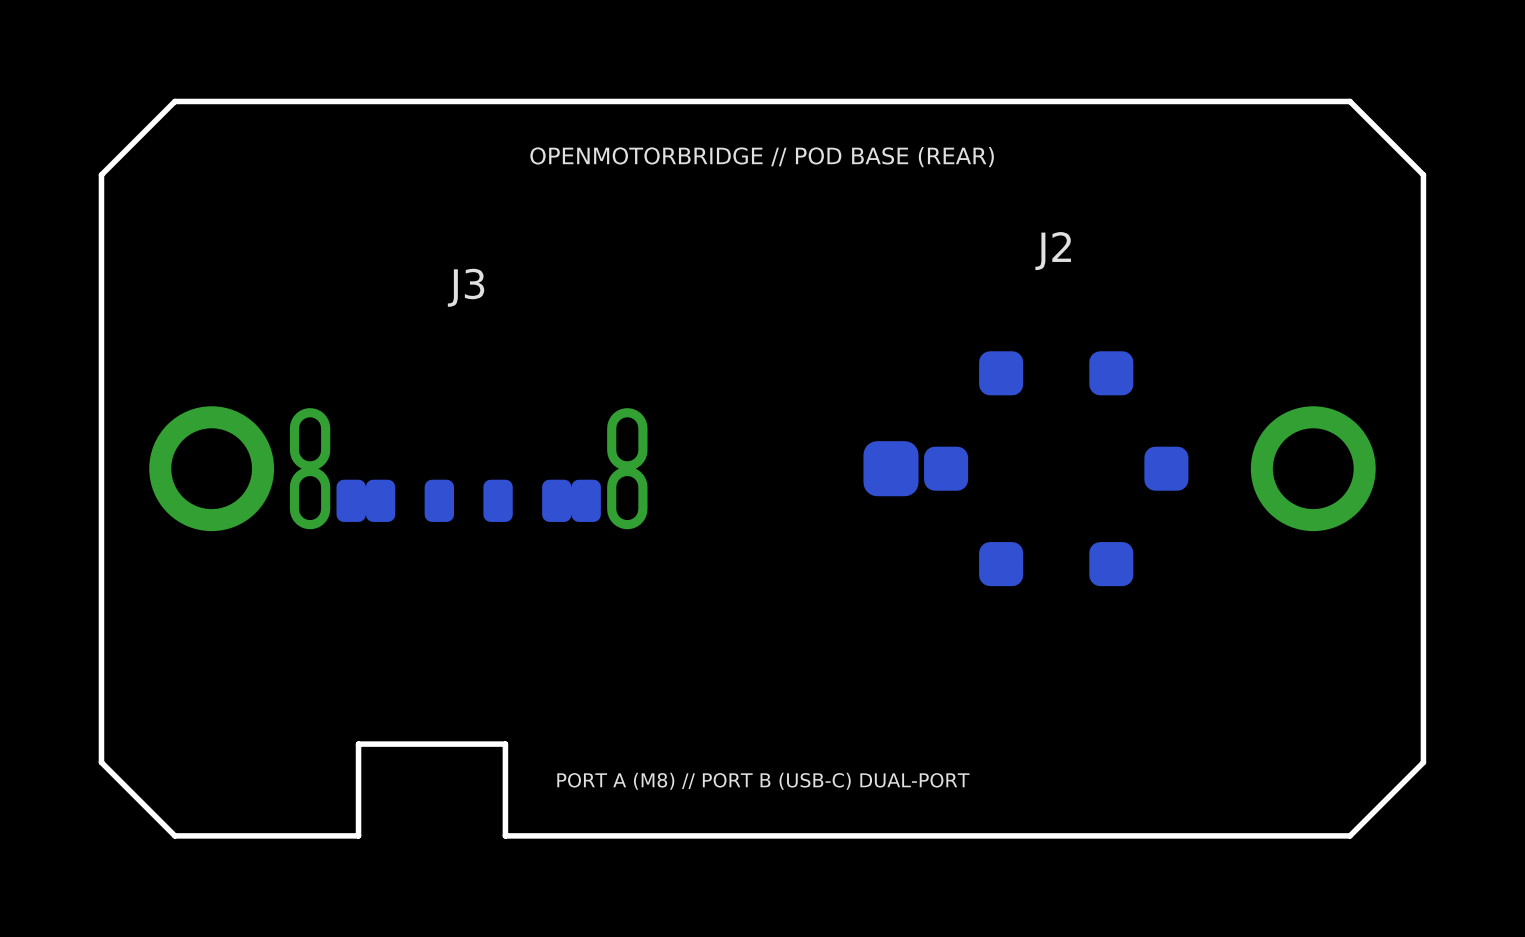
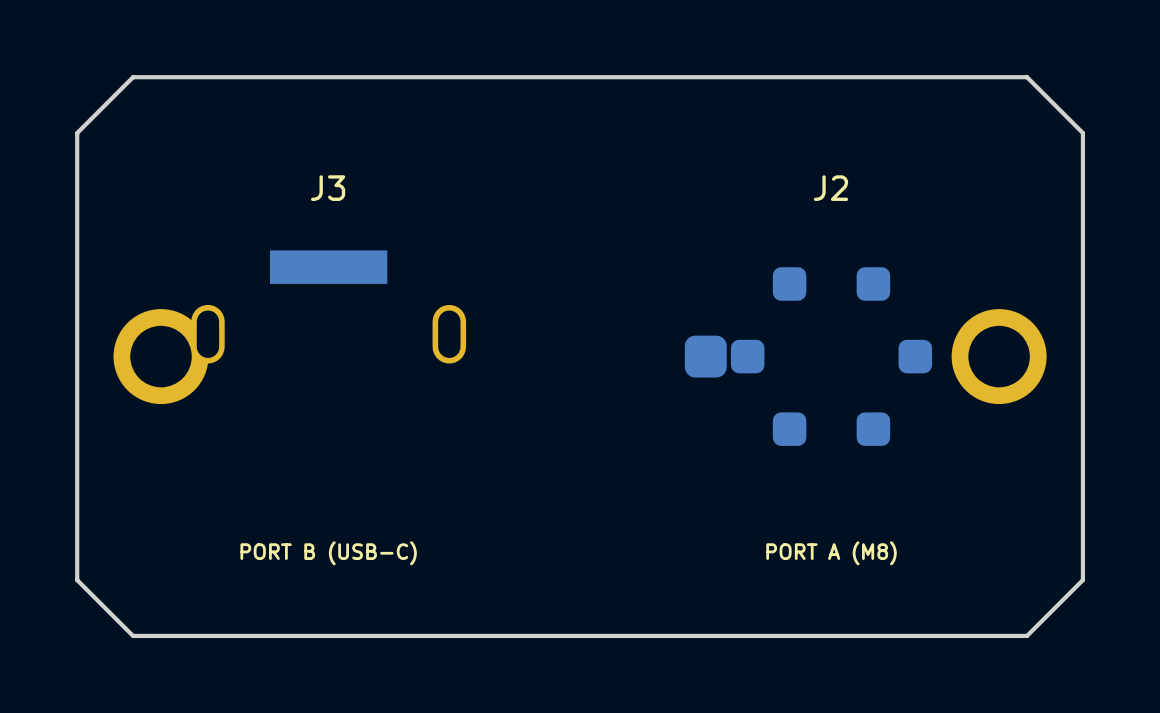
text: OPENMOTORBRIDGE // POD BASE (REAR) (762, 157) -> none
J3 footprint: [289, 408, 648, 530] -> [191, 250, 467, 364]
J2 position: (1025, 468) -> (808, 356)
text: none -> PORT B (USB-C) (328, 553)
text: none -> PORT A (M8) (831, 553)
text: PORT A (M8) // PORT B (USB-C) DUAL-PORT (763, 781) -> none
board edge: (505, 835) (505, 744) (358, 744) (358, 835) -> (384, 635) (272, 635)

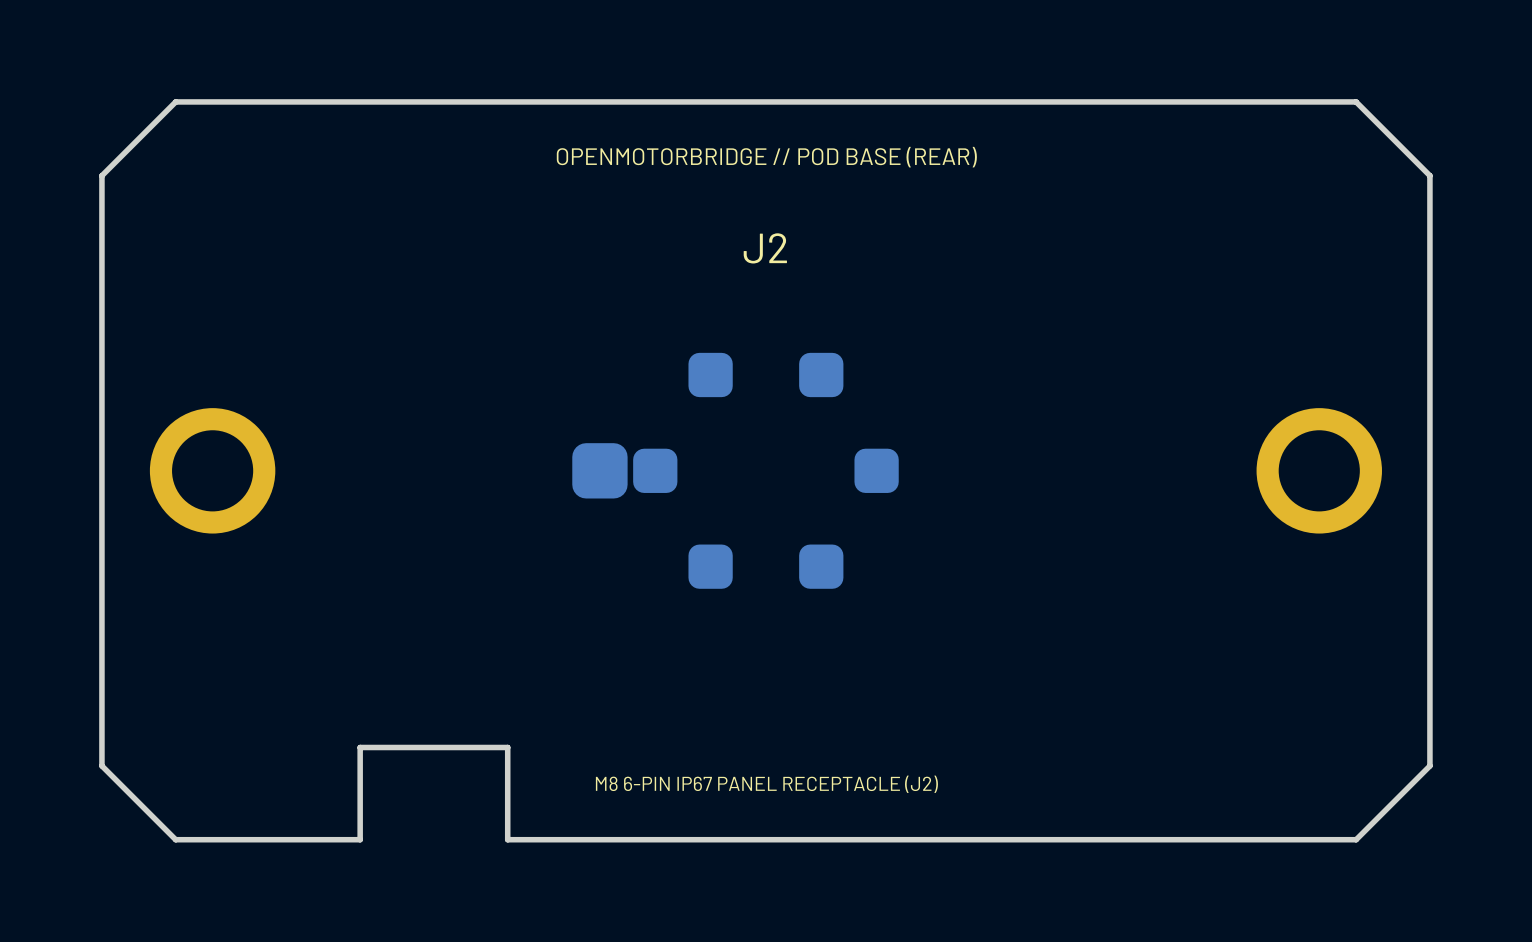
text: none -> OPENMOTORBRIDGE // POD BASE (REAR) (766, 157)
J3: (328, 306) -> none
J2 position: (808, 356) -> (735, 470)
text: PORT B (USB-C) (328, 553) -> none
text: PORT A (M8) (831, 553) -> none
text: none -> M8 6-PIN IP67 PANEL RECEPTACLE (J2) (766, 784)
board edge: (384, 635) (272, 635) -> (507, 839) (507, 747) (360, 747) (360, 839)

